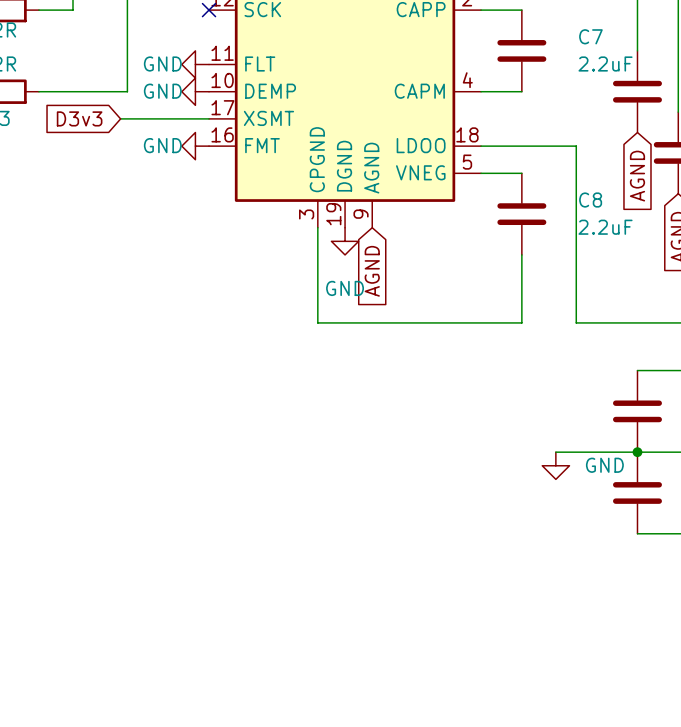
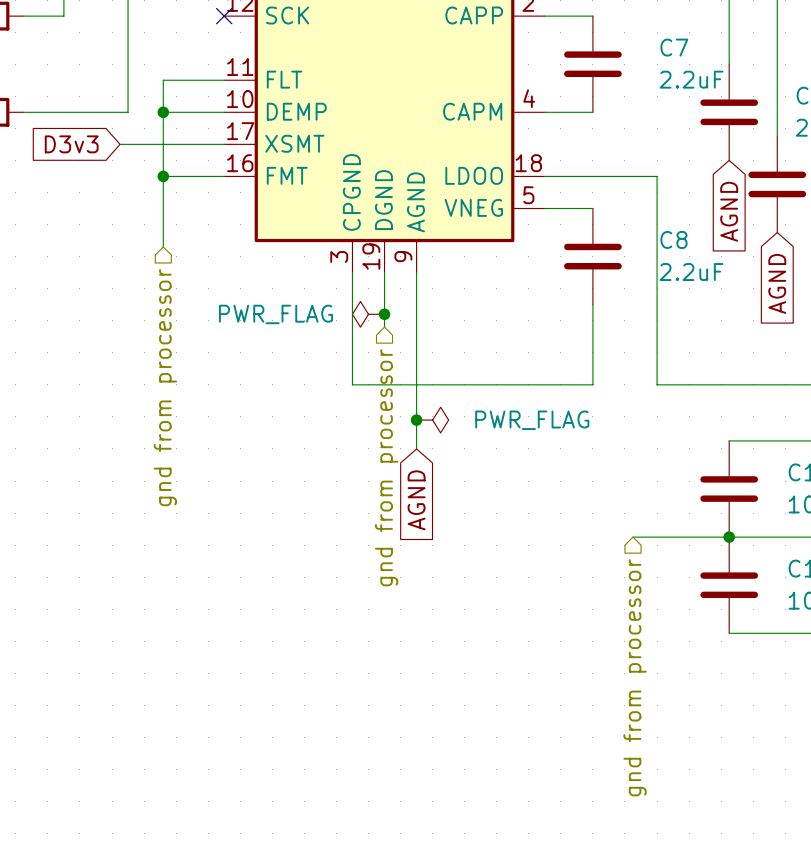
power symbol: GND (195, 64) -> none
wire: none -> (224, 80) (163, 80) (163, 246)
wire: none -> (163, 112) (224, 112)
junction: none -> (163, 112)
power symbol: GND (195, 91) -> none
wire: none -> (163, 176) (224, 176)
junction: none -> (163, 176)
power symbol: GND (195, 146) -> none
wire: none -> (384, 272) (384, 327)
wire: none -> (416, 272) (416, 448)
power symbol: GND (345, 241) -> none
power symbol: none -> PWR_FLAG (368, 314)
junction: none -> (384, 314)
global label position: AGND (372, 271) -> AGND (416, 500)
hierarchical label: none -> gnd from processor (165, 387)
junction: none -> (416, 420)
power symbol: none -> PWR_FLAG (432, 420)
hierarchical label: none -> gnd from processor (386, 467)
power symbol: GND (555, 465) -> none
hierarchical label: none -> gnd from processor (635, 677)

